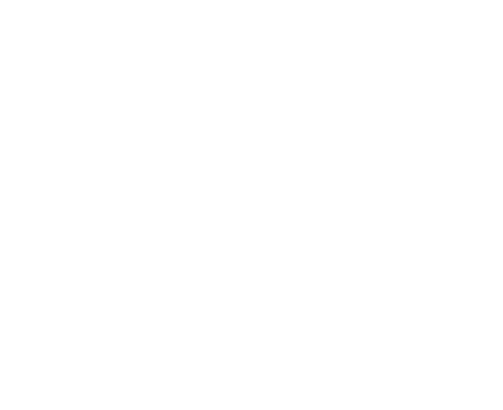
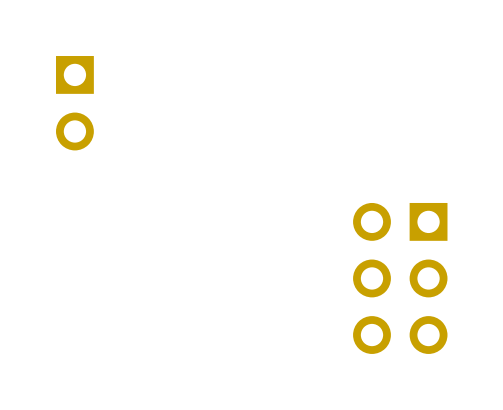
part: none -> (74, 103)
part: none -> (400, 278)

